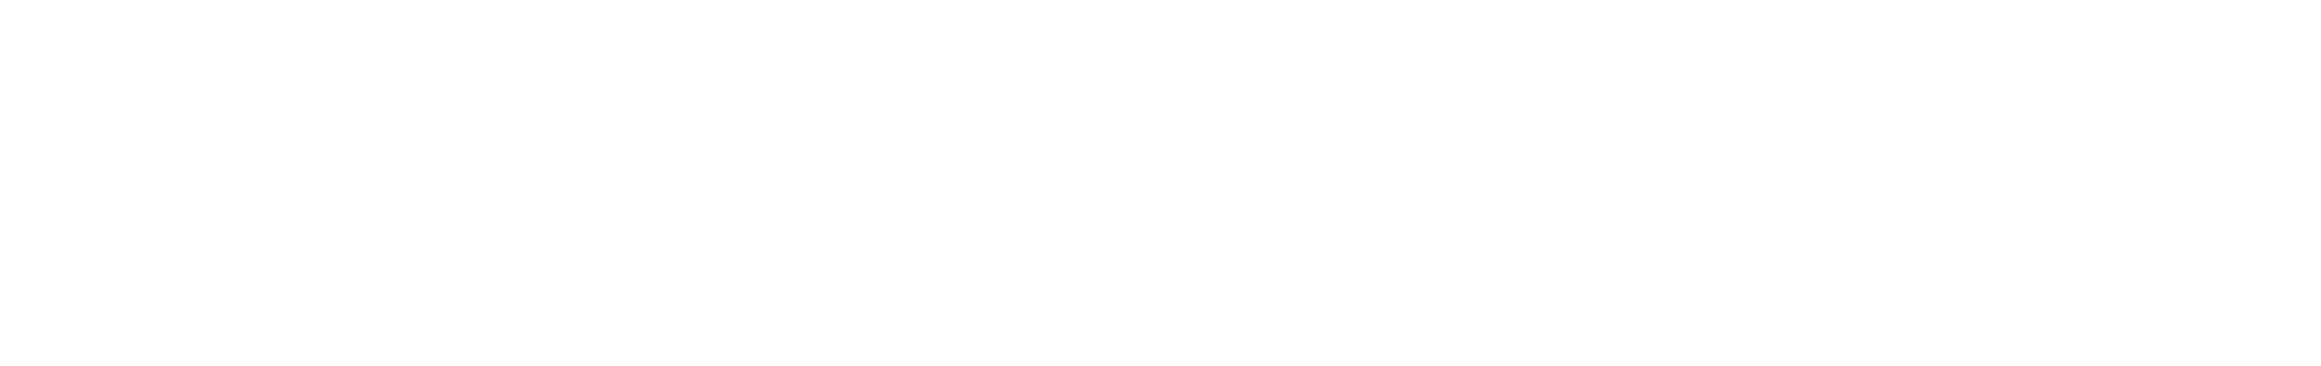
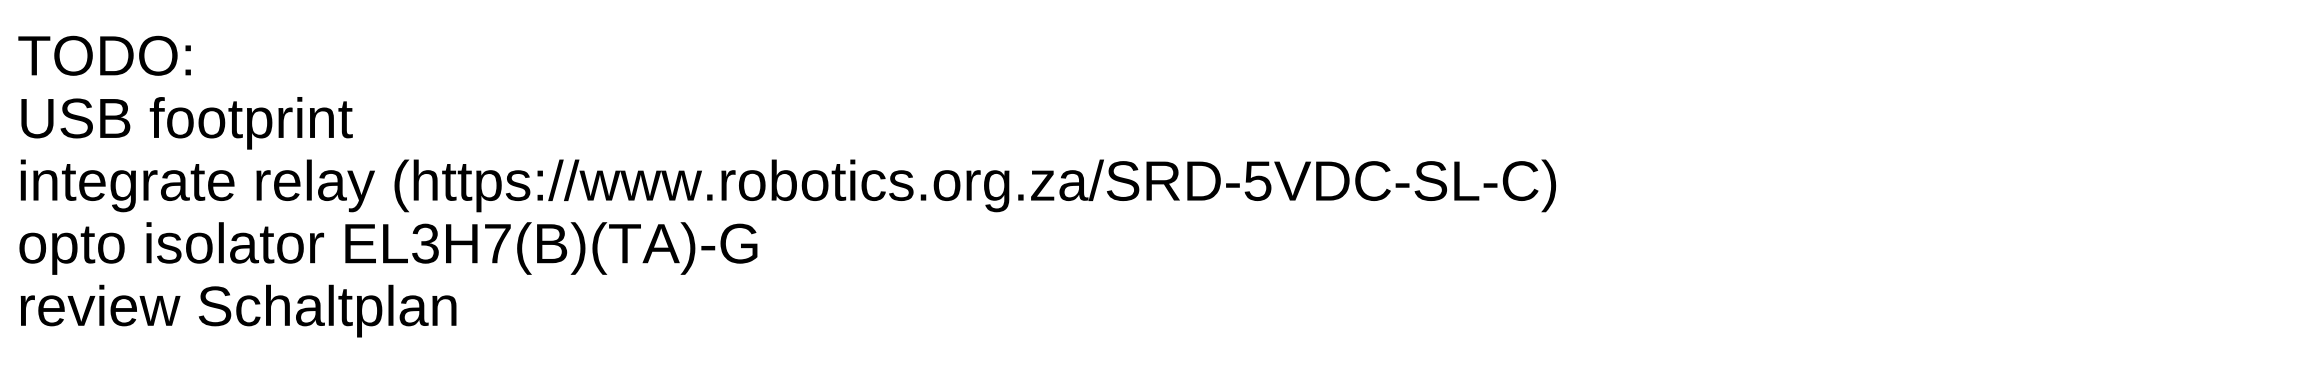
text: none -> TODO: (104, 55)
text: none -> USB footprint (187, 123)
text: none -> integrate relay (https://www.robotics.org.za/SRD-5VDC-SL-C) (788, 185)
text: none -> opto isolator EL3H7(B)(TA)-G (388, 248)
text: none -> review Schaltplan (238, 311)

